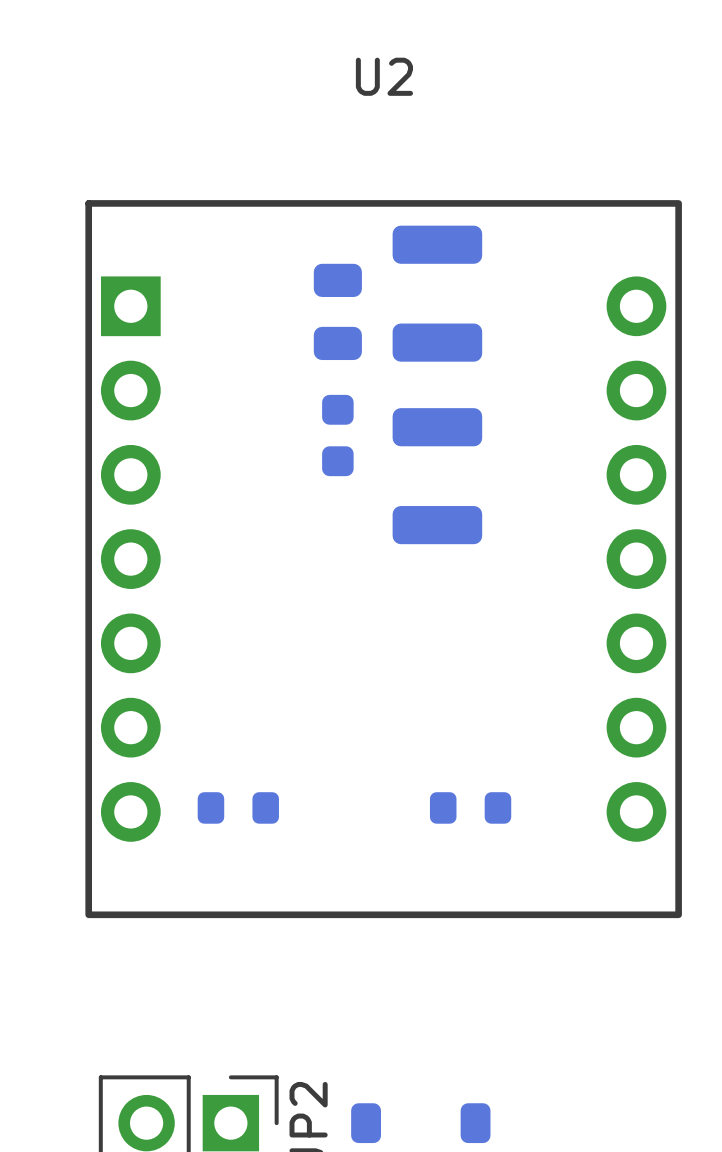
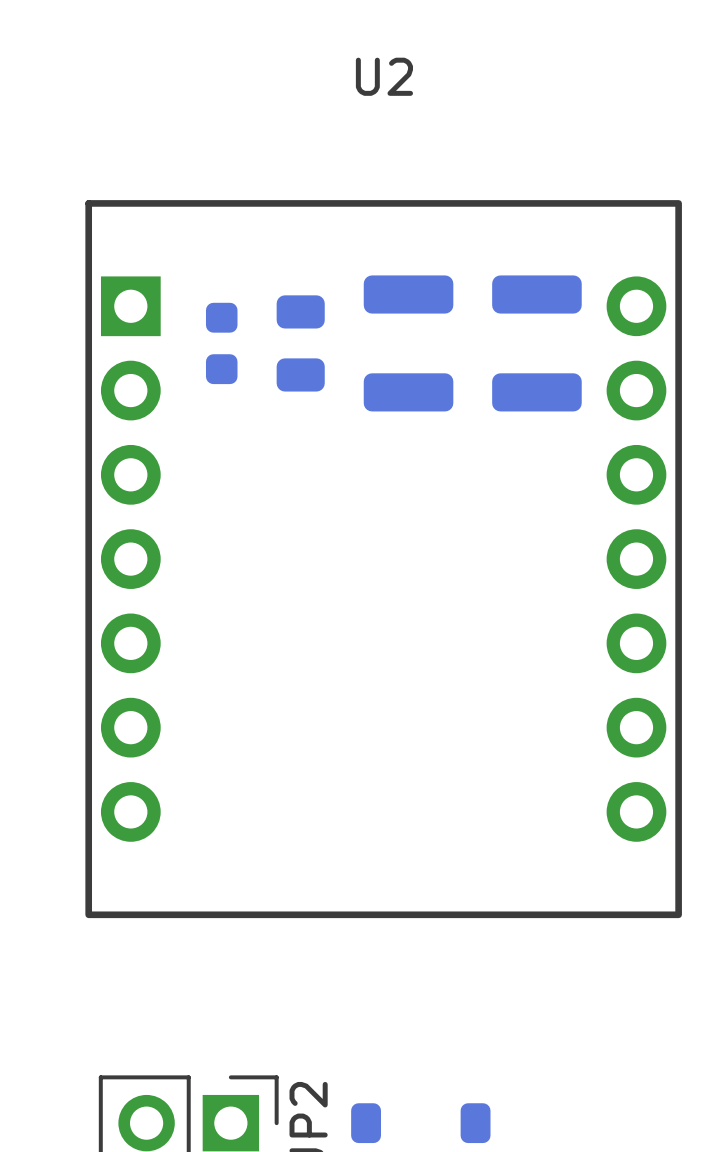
part: (437, 293) -> none
part position: (337, 311) -> (300, 343)
part: none -> (408, 343)
part: none -> (536, 343)
part position: (337, 435) -> (221, 343)
part: (437, 476) -> none
part: (238, 807) -> none
part: (470, 807) -> none

